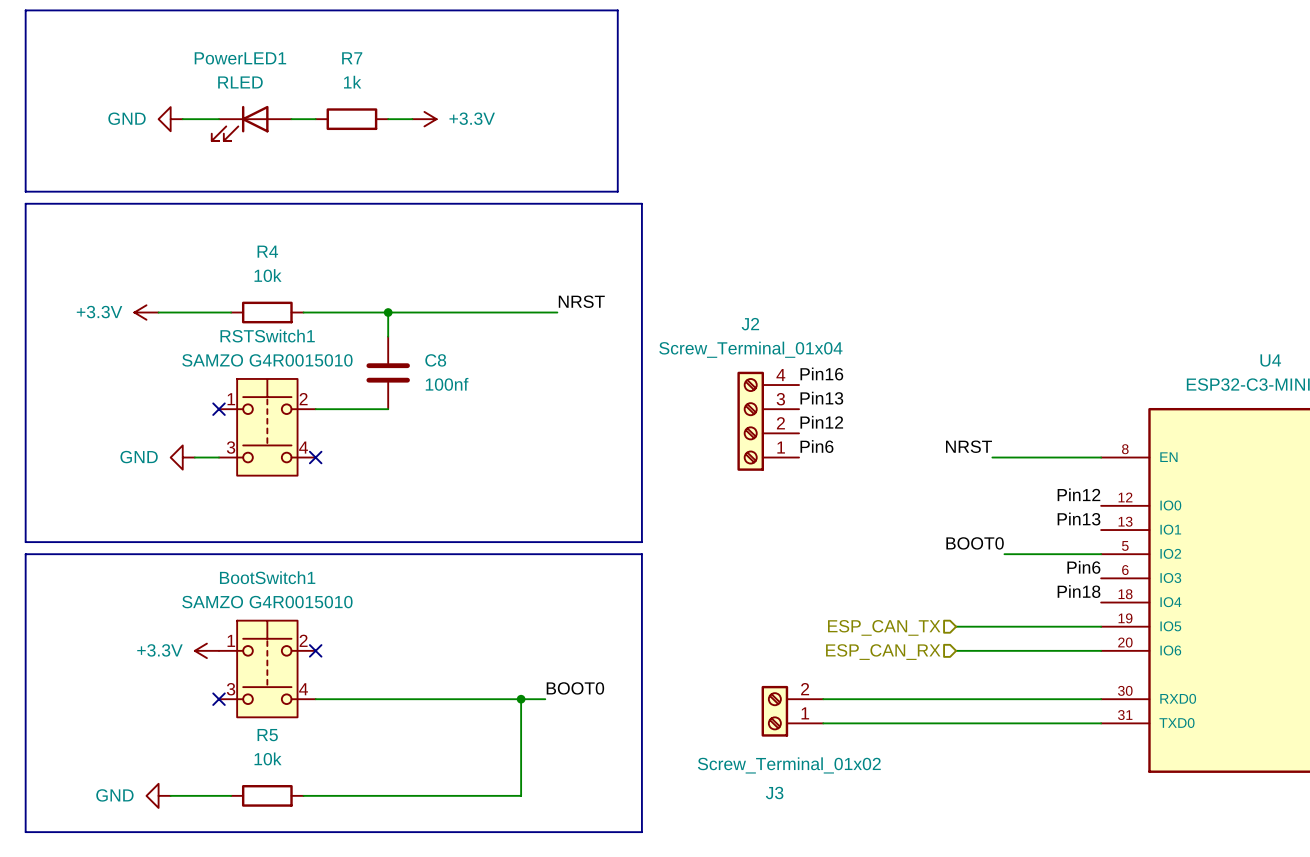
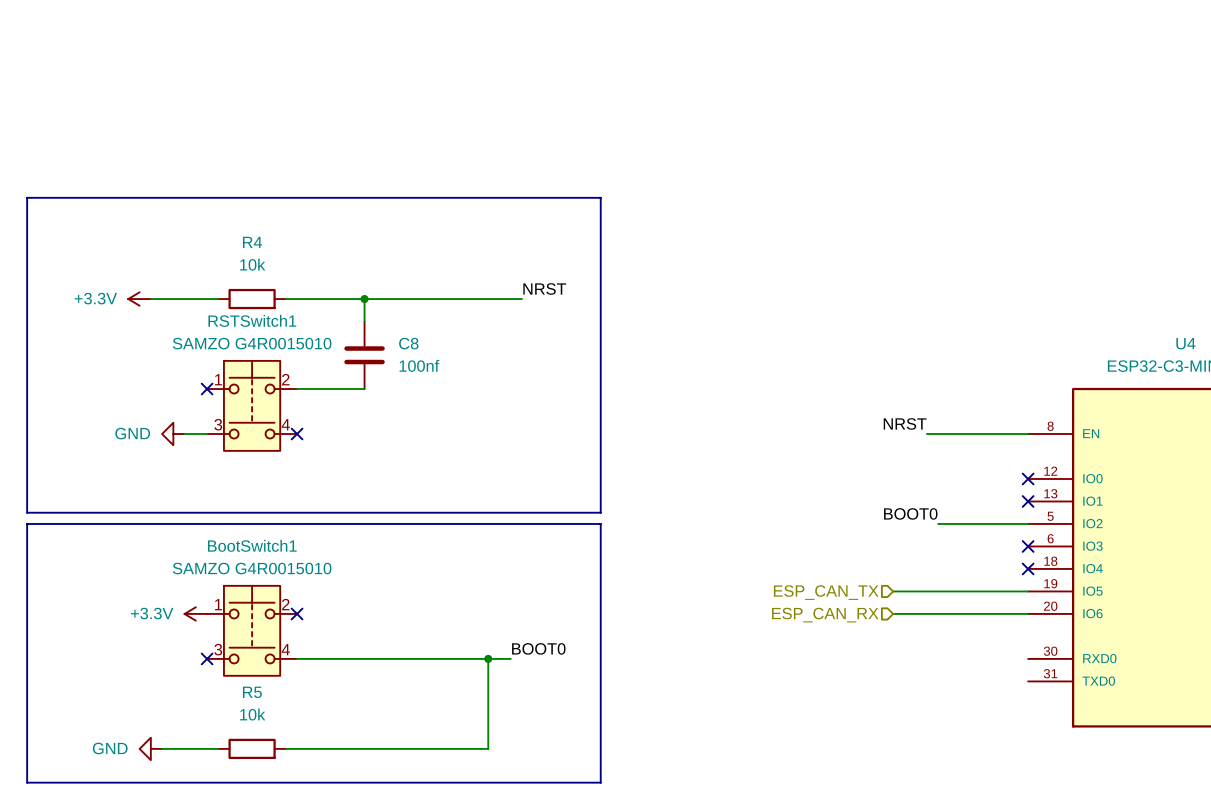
line: (25, 10) (617, 10) (617, 191) (25, 191) (25, 10) -> none
power symbol: GND (170, 119) -> none
wire: (182, 119) (219, 119) -> none
wire: (291, 119) (315, 119) -> none
R7: 1k (351, 119) -> none
wire: (388, 119) (412, 119) -> none
power symbol: +3.3V (424, 119) -> none
PowerLED1: RLED (251, 123) -> none
label: Pin16 (821, 374) -> none
label: Pin13 (821, 398) -> none
J2: Screw_Terminal_01x04 (768, 421) -> none
label: Pin12 (821, 422) -> none
label: Pin6 (816, 446) -> none
label: Pin12 (1078, 494) -> none
no-connect mark: none -> (1028, 478)
label: Pin13 (1079, 519) -> none
no-connect mark: none -> (1028, 501)
label: Pin6 (1083, 567) -> none
no-connect mark: none -> (1028, 546)
label: Pin18 (1079, 591) -> none
no-connect mark: none -> (1028, 568)
wire: (823, 699) (1101, 699) -> none
J3: Screw_Terminal_01x02 (792, 711) -> none
wire: (823, 723) (1101, 723) -> none

